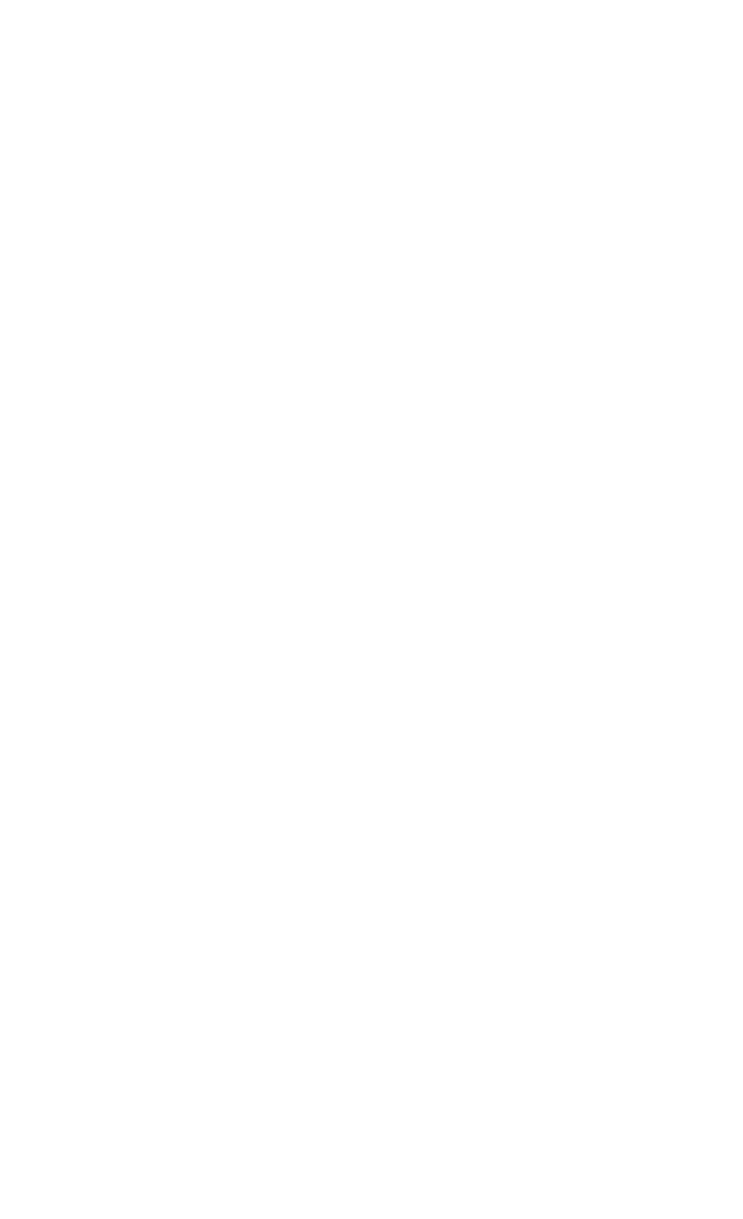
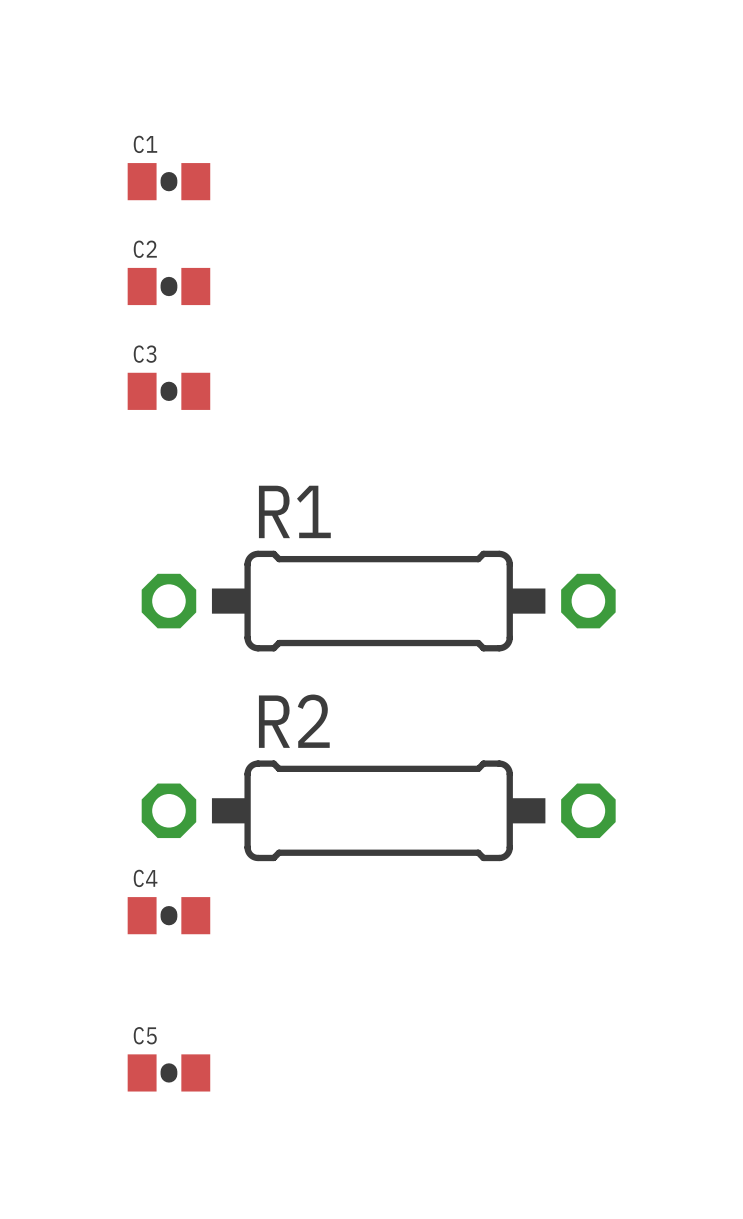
C1: none -> (168, 181)
C2: none -> (168, 286)
C3: none -> (168, 391)
R1: none -> (378, 601)
R2: none -> (378, 810)
C4: none -> (168, 915)
C5: none -> (168, 1072)

